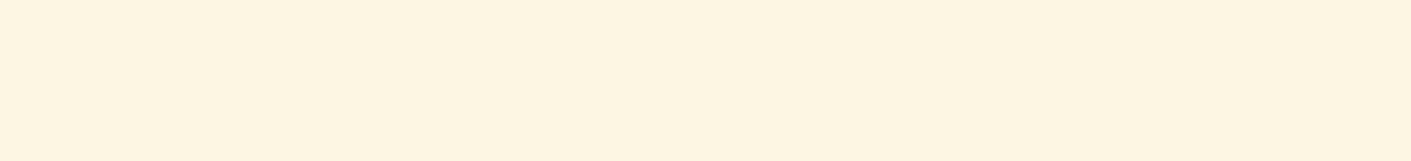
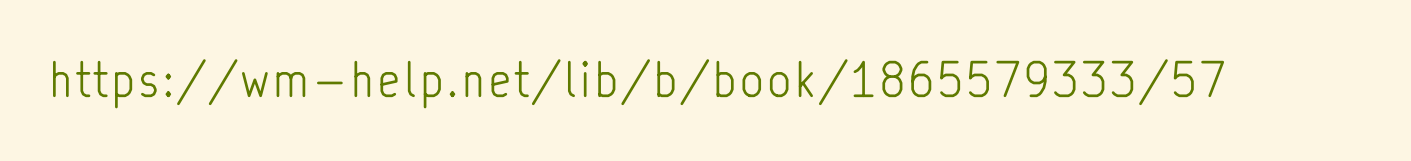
text: none -> https://wm-help.net/lib/b/book/1865579333/57 (638, 83)

